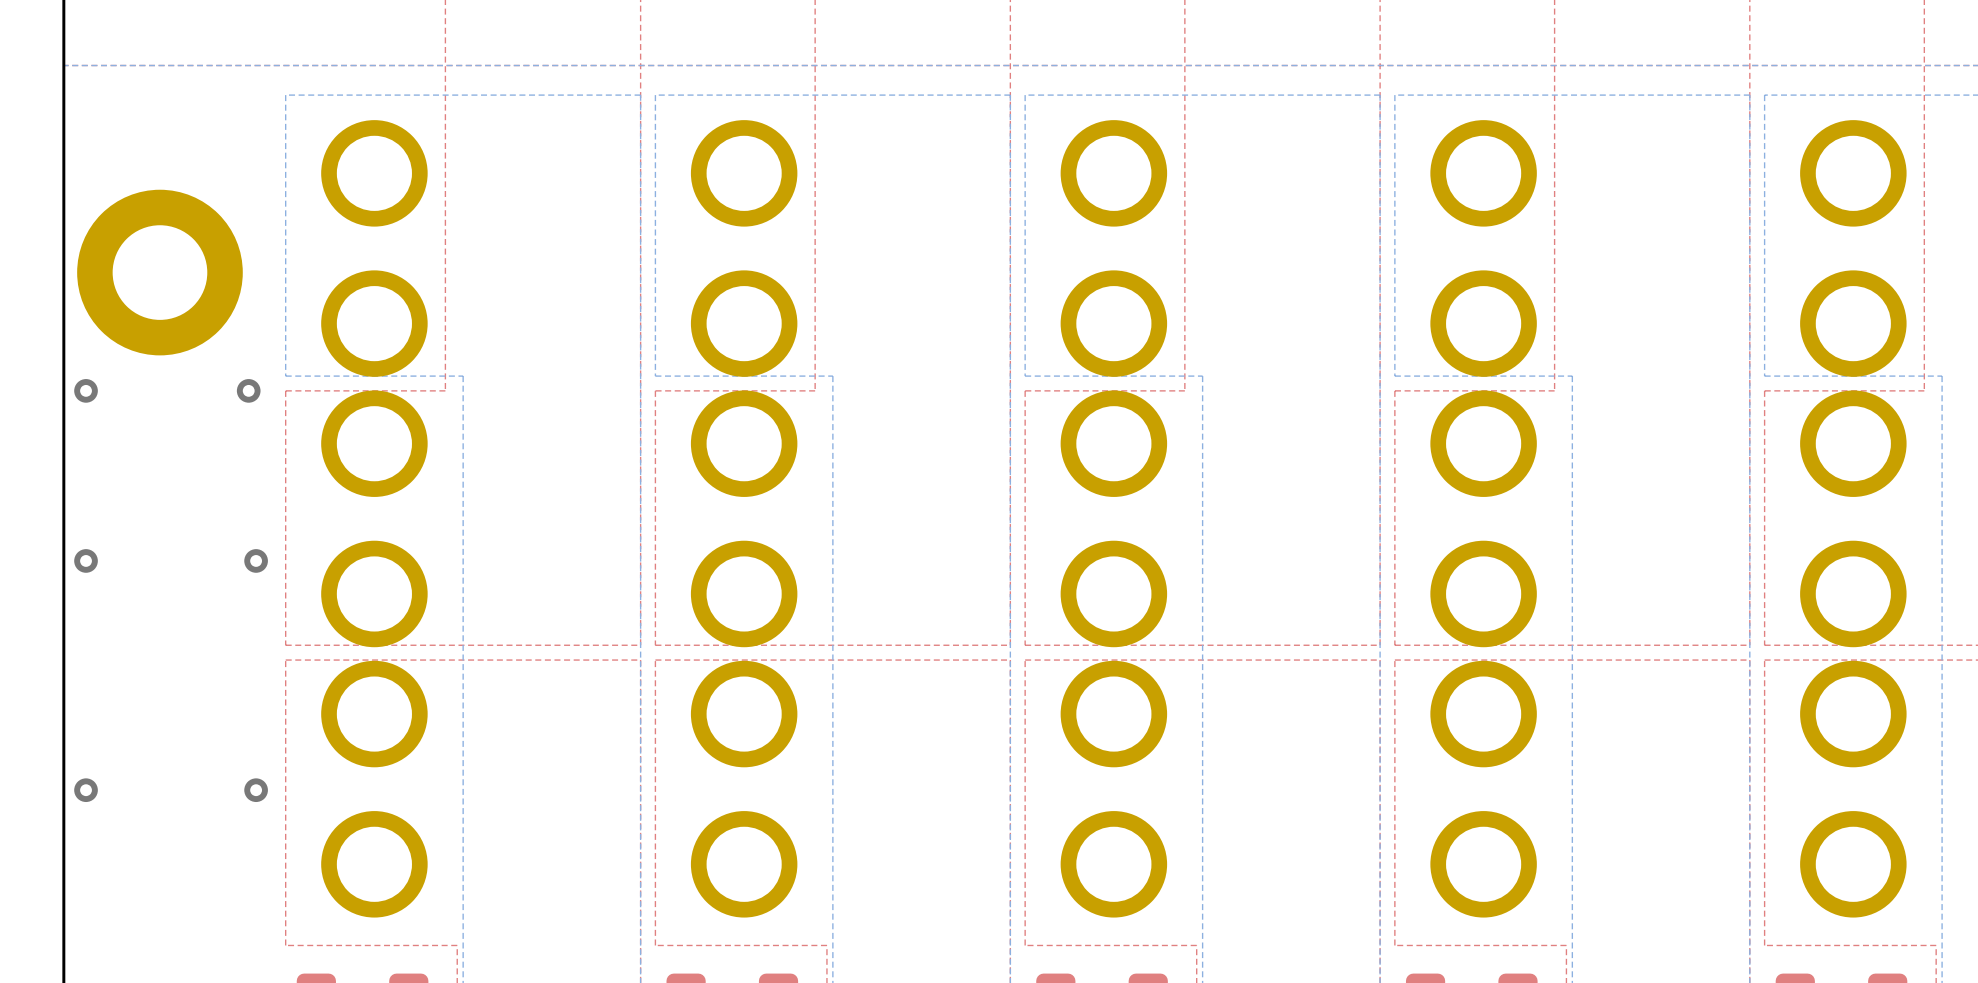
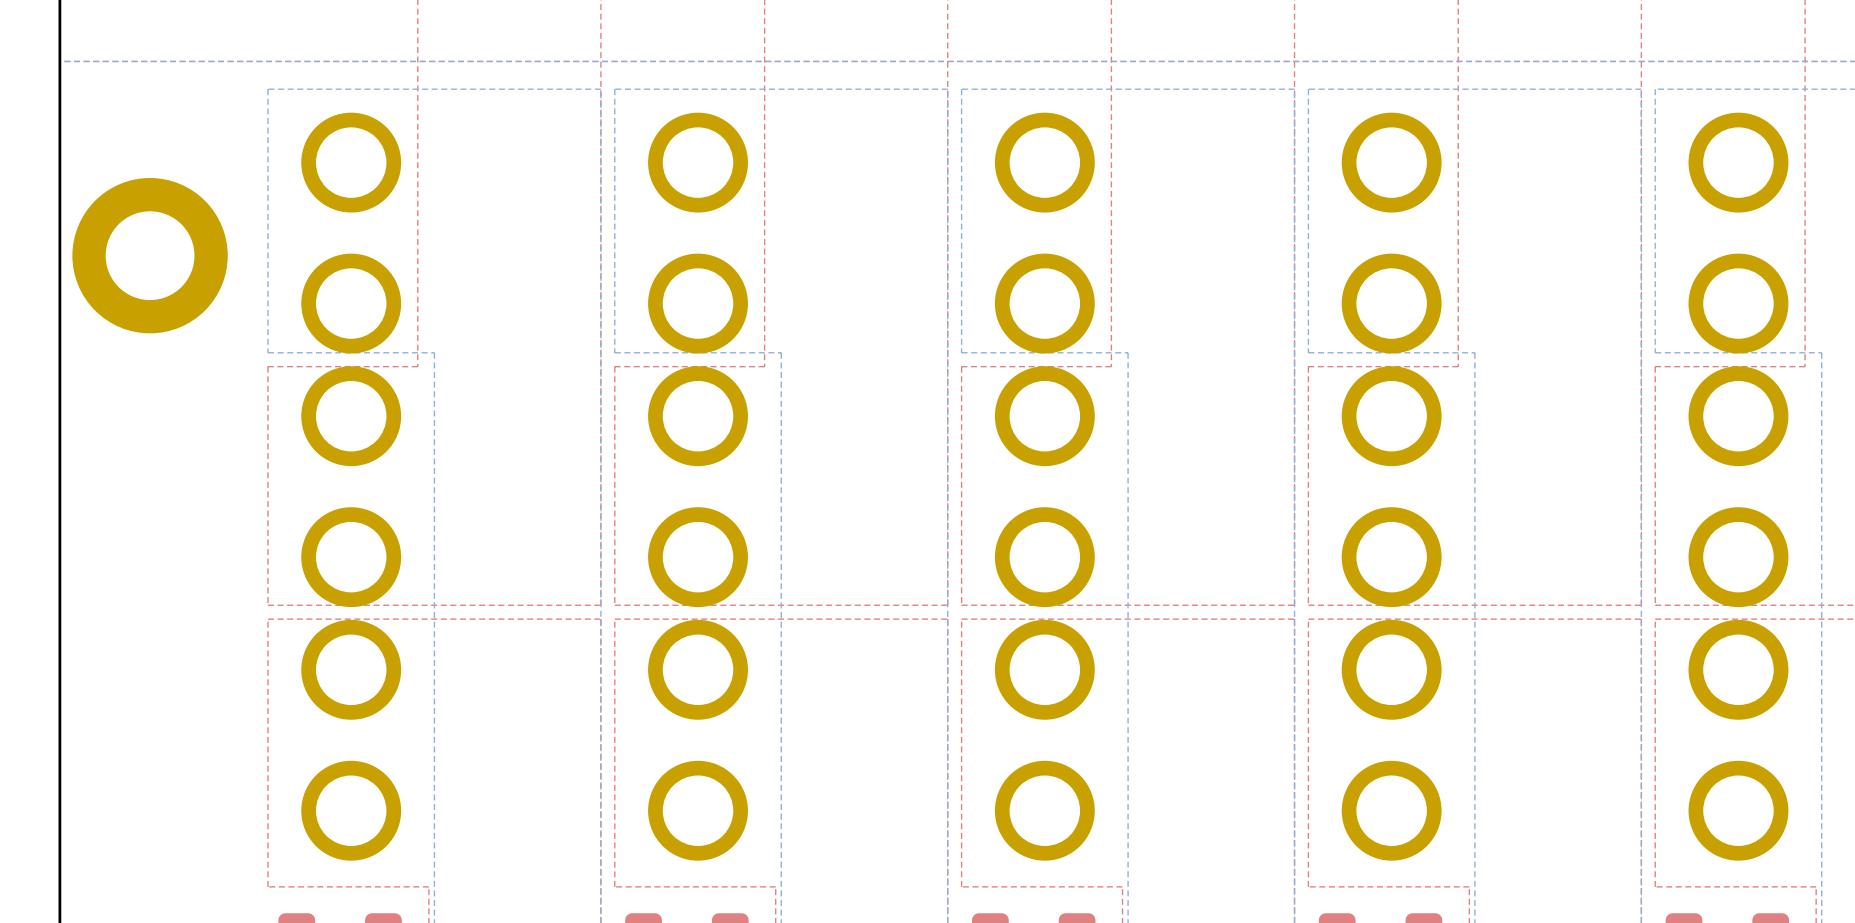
via: (86, 390) -> none
via: (248, 390) -> none
via: (86, 560) -> none
via: (256, 560) -> none
via: (86, 790) -> none
via: (256, 790) -> none

